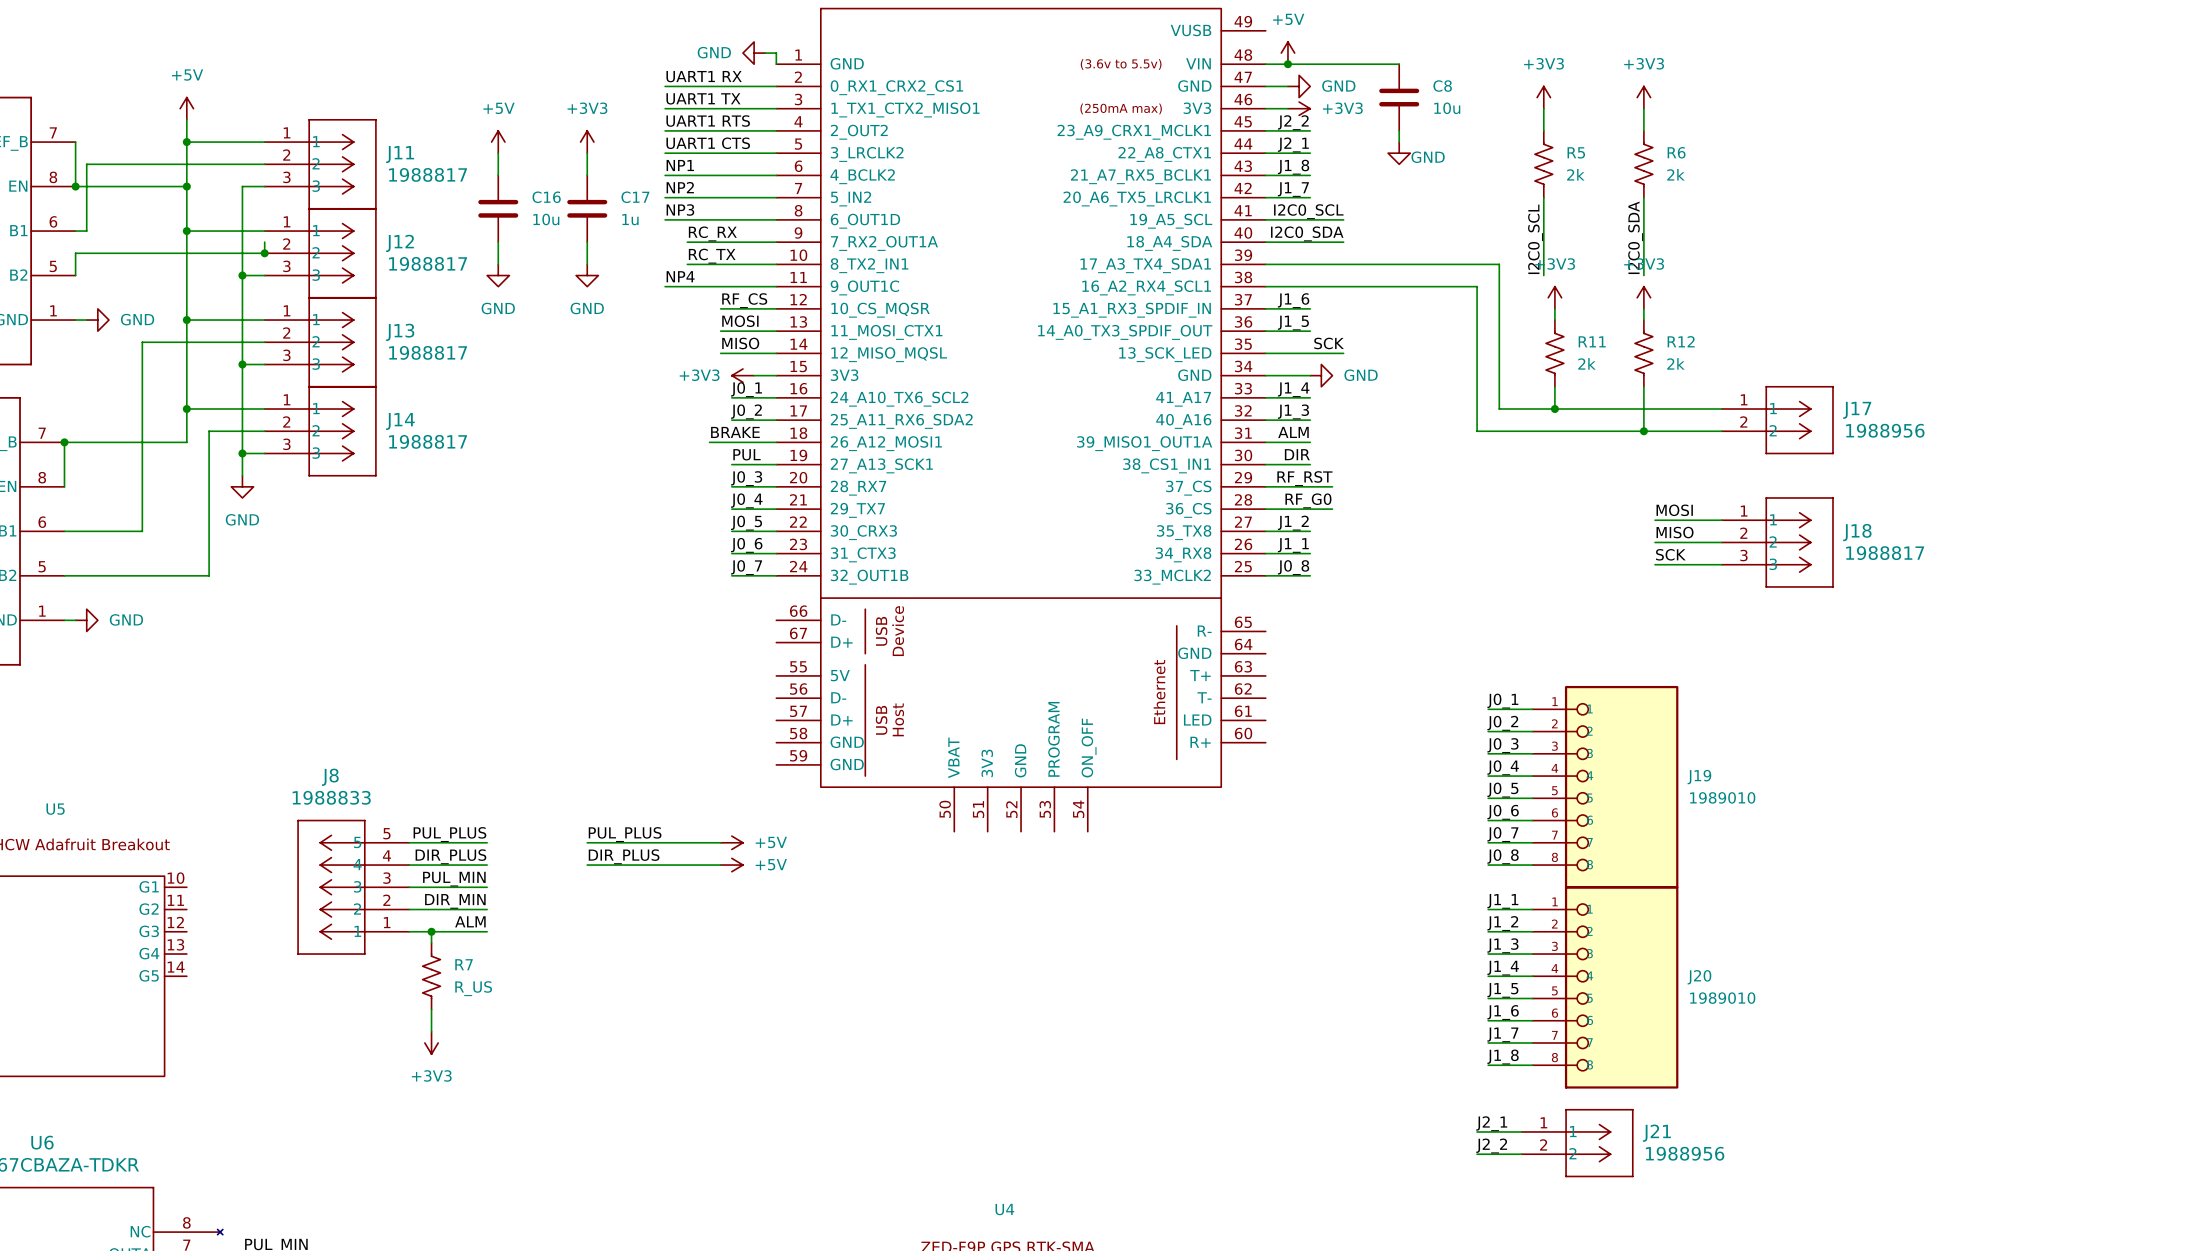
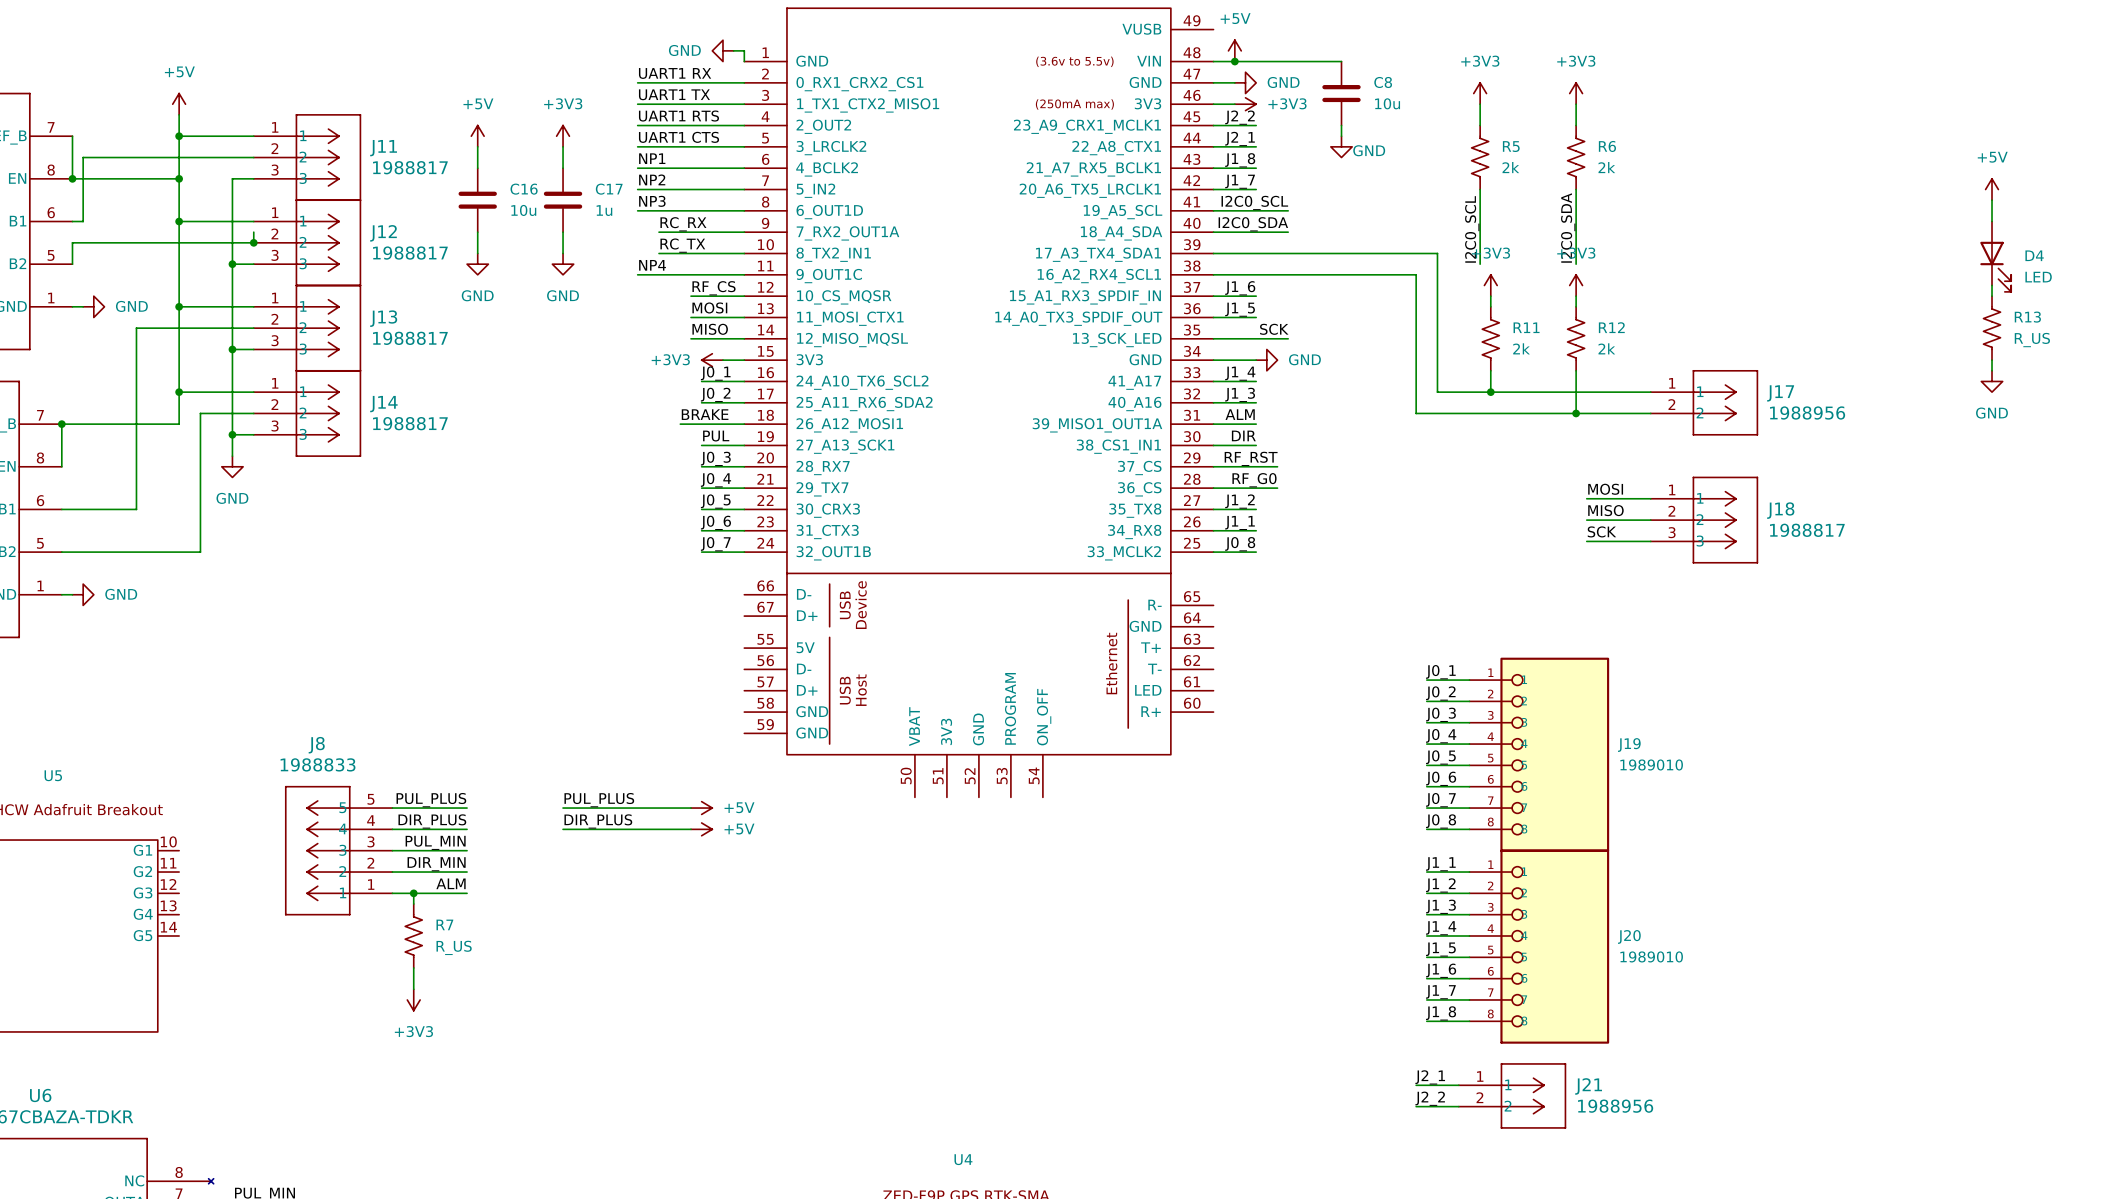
power symbol: none -> +5V (1992, 189)
wire: none -> (1992, 200) (1992, 221)
D4: none -> LED (1995, 256)
wire: none -> (1992, 285) (1992, 296)
R13: none -> R_US (1992, 328)
wire: none -> (1992, 360) (1992, 370)
power symbol: none -> GND (1992, 381)

